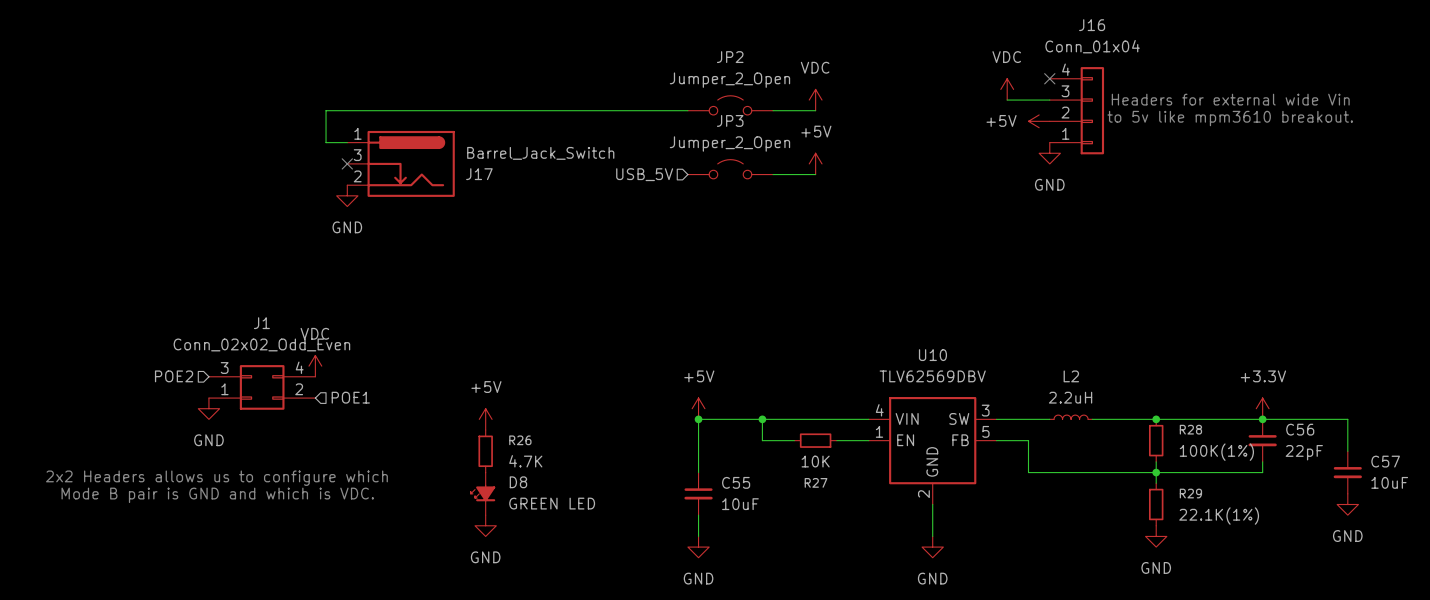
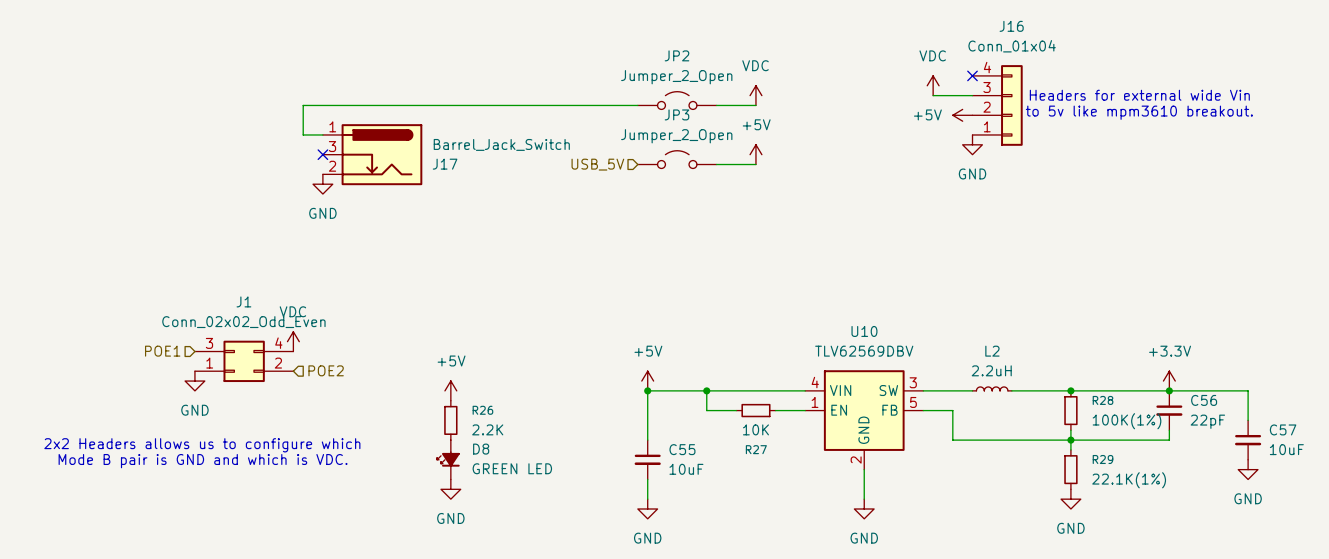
hierarchical label: POE2 (174, 376) -> POE1 (162, 351)
hierarchical label: POE1 (350, 397) -> POE2 (326, 370)
R26 value: 4.7K (525, 461) -> 2.2K (487, 429)

